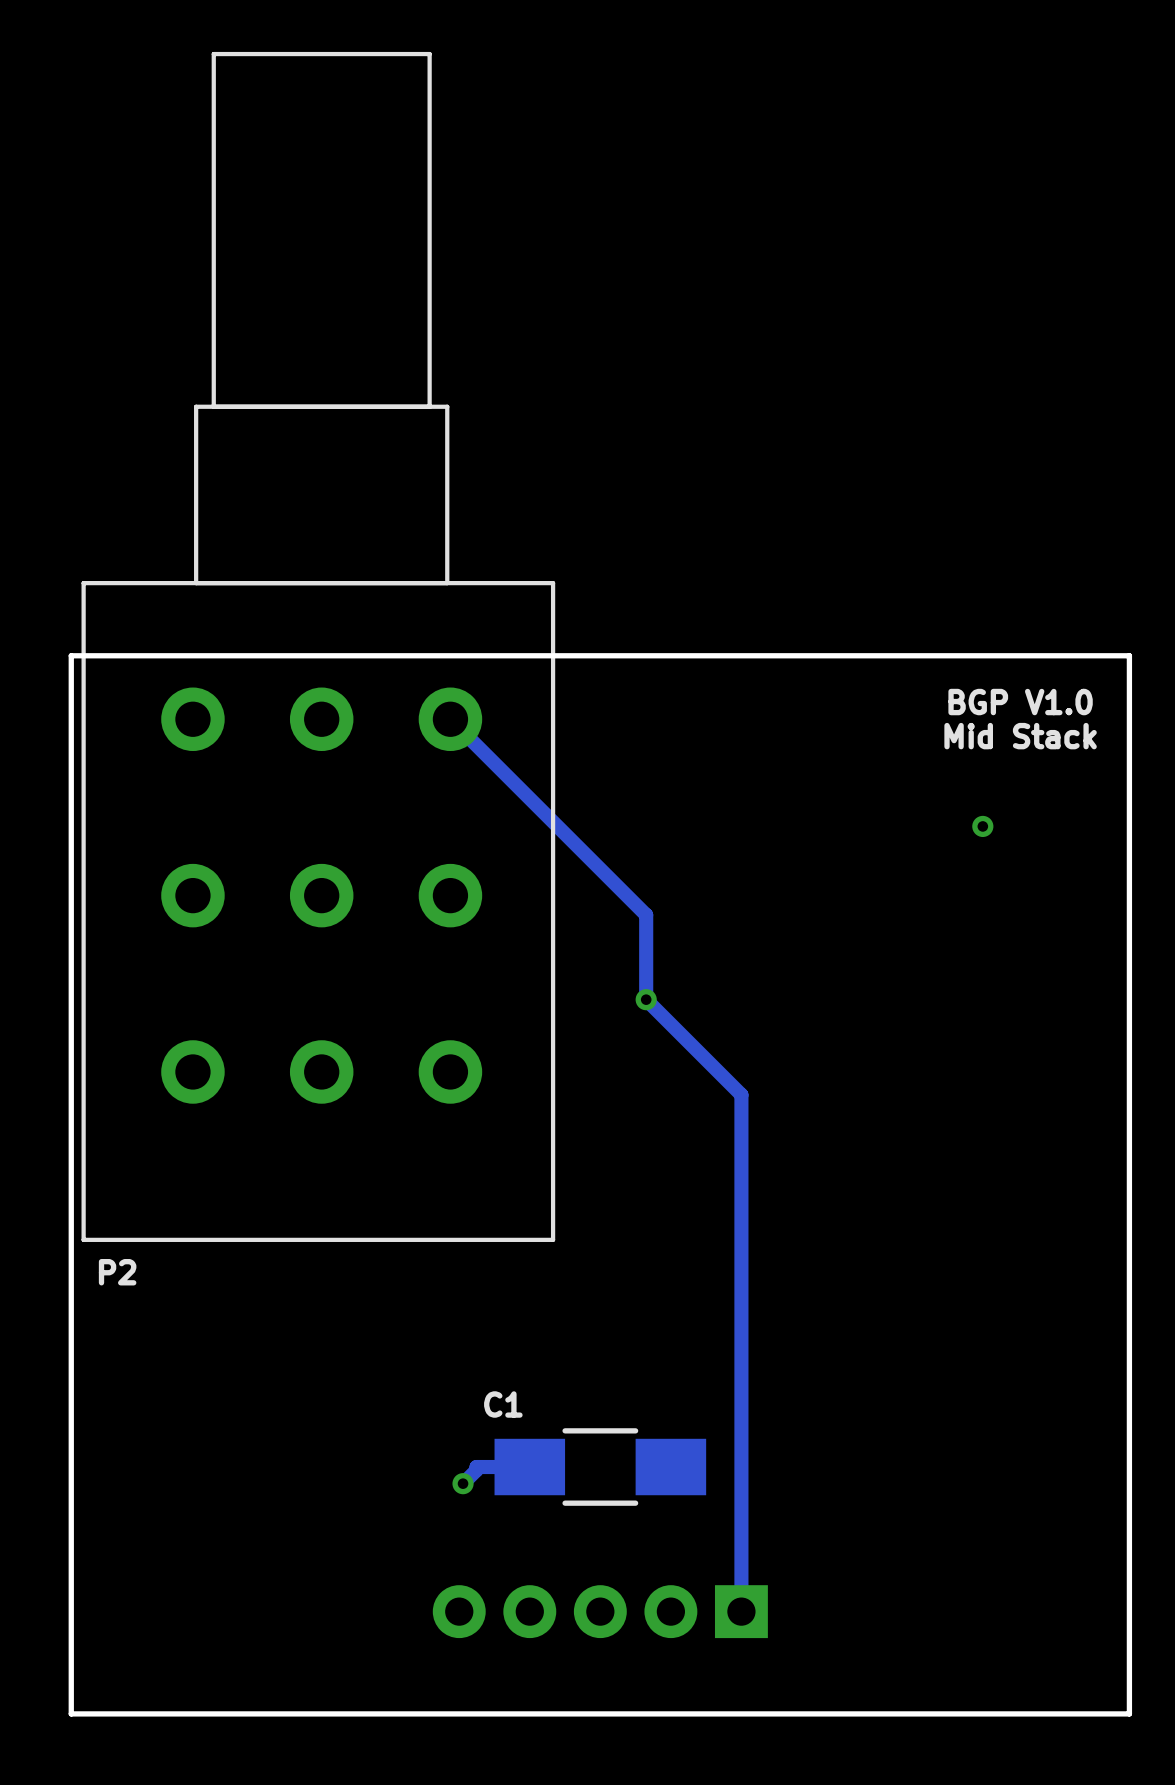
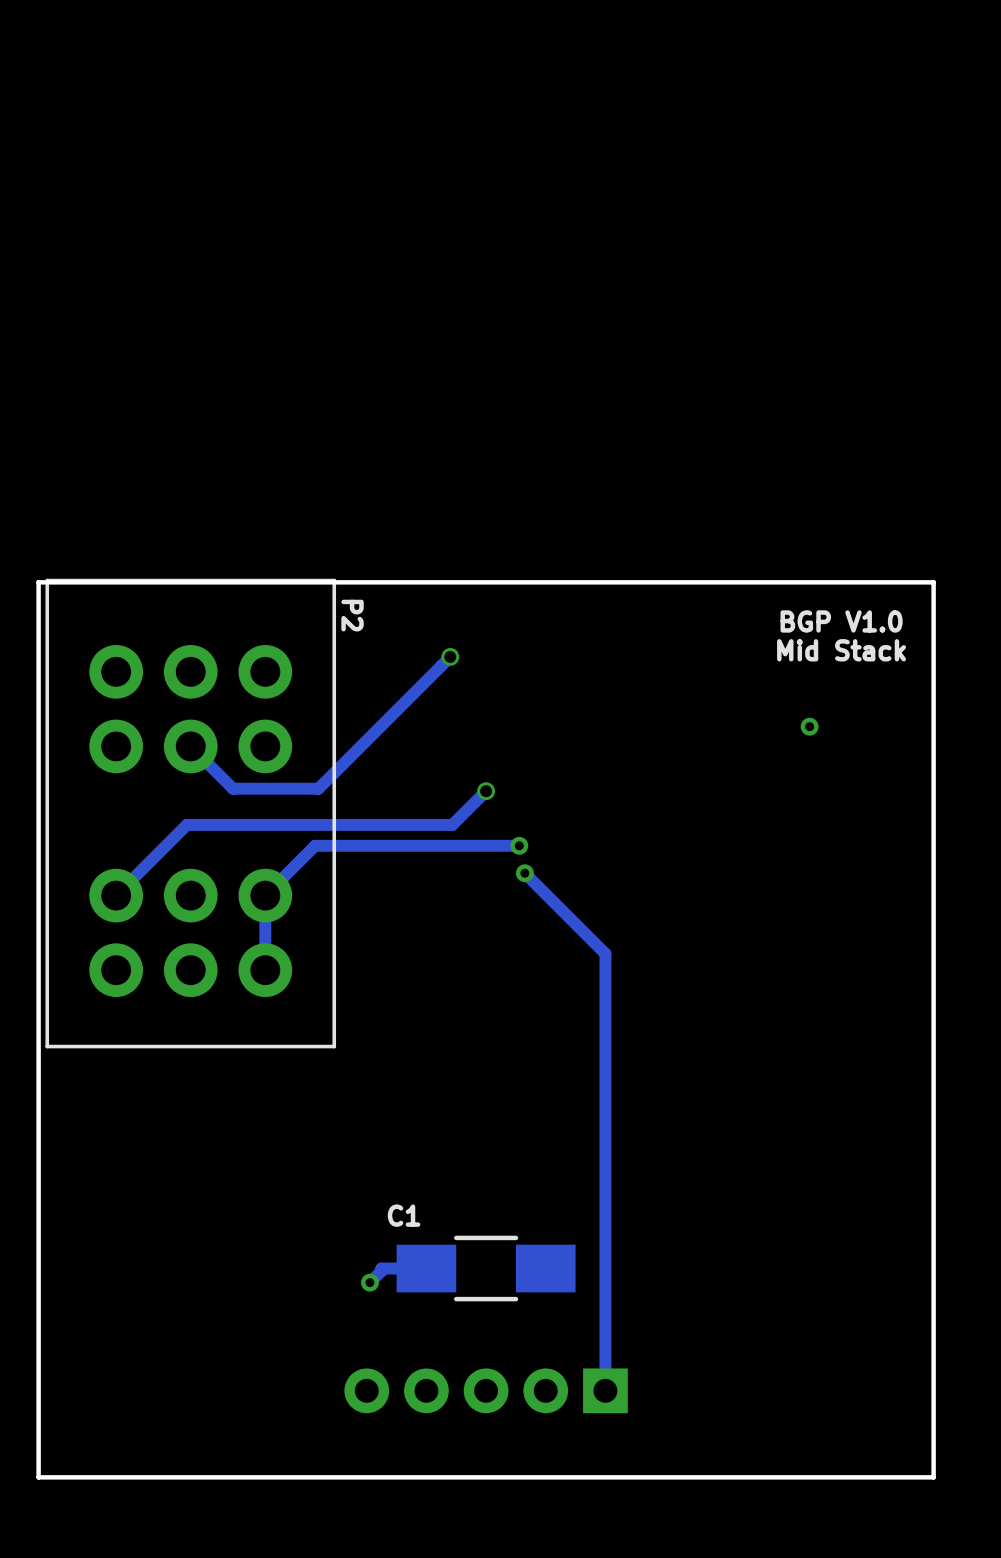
P2 footprint: [81, 51, 556, 1242] -> [45, 578, 337, 1049]
track: (450, 719) (646, 915) (646, 999) -> none
track: none -> (450, 656) (318, 788) (233, 788) (190, 746)
via: none -> (450, 656)
track: none -> (486, 791) (452, 824) (186, 824) (116, 895)
via: none -> (486, 791)
track: none -> (519, 845) (315, 845) (265, 895) (265, 970)
via: none -> (519, 845)
P2 name position: P2 (117, 1272) -> P2 (352, 615)

